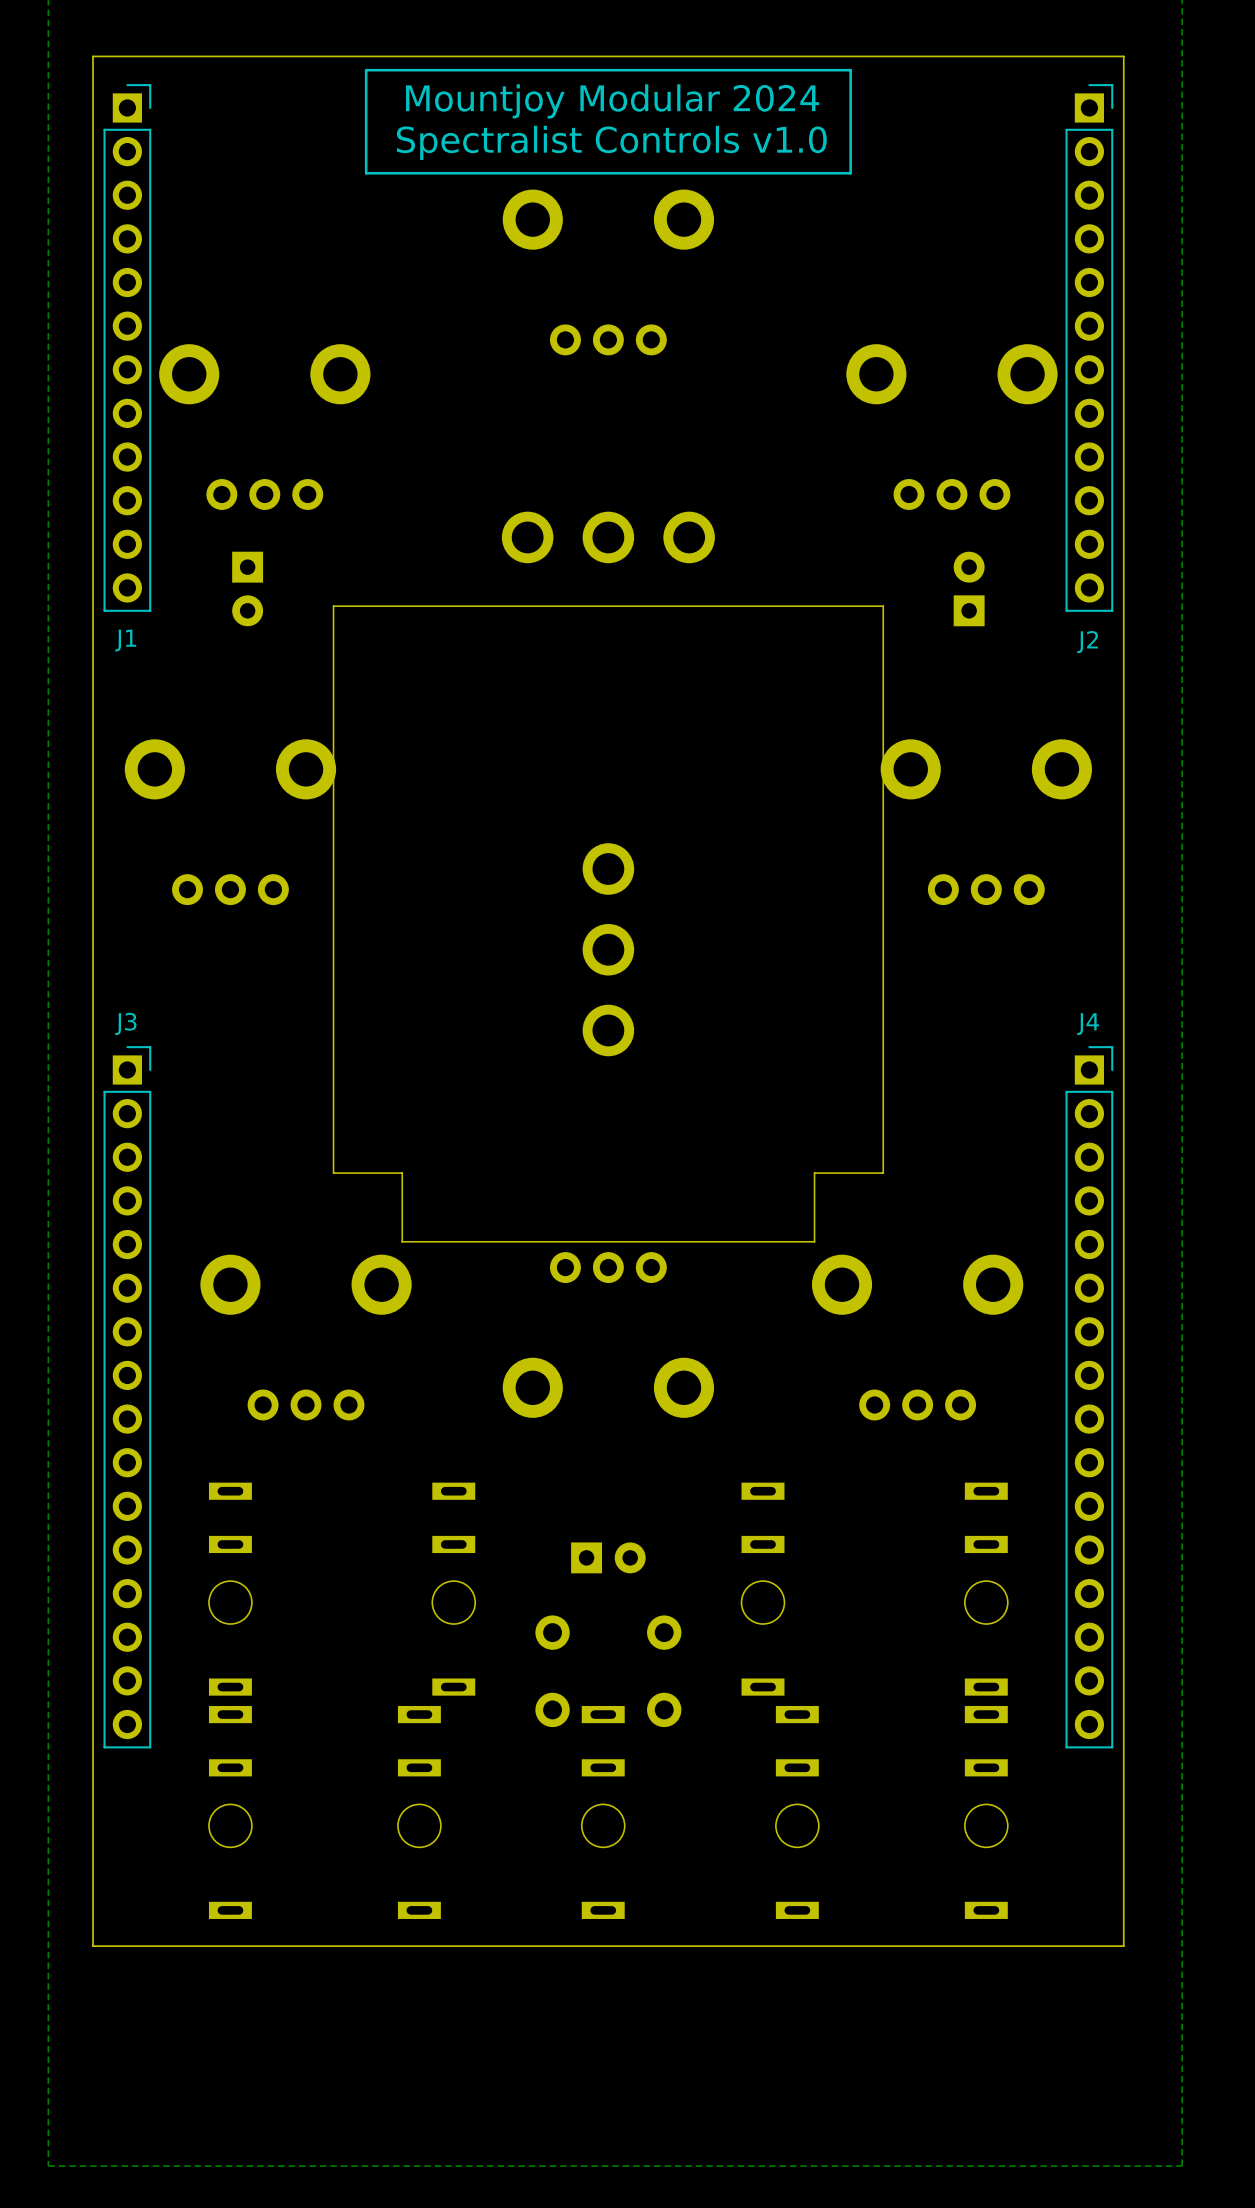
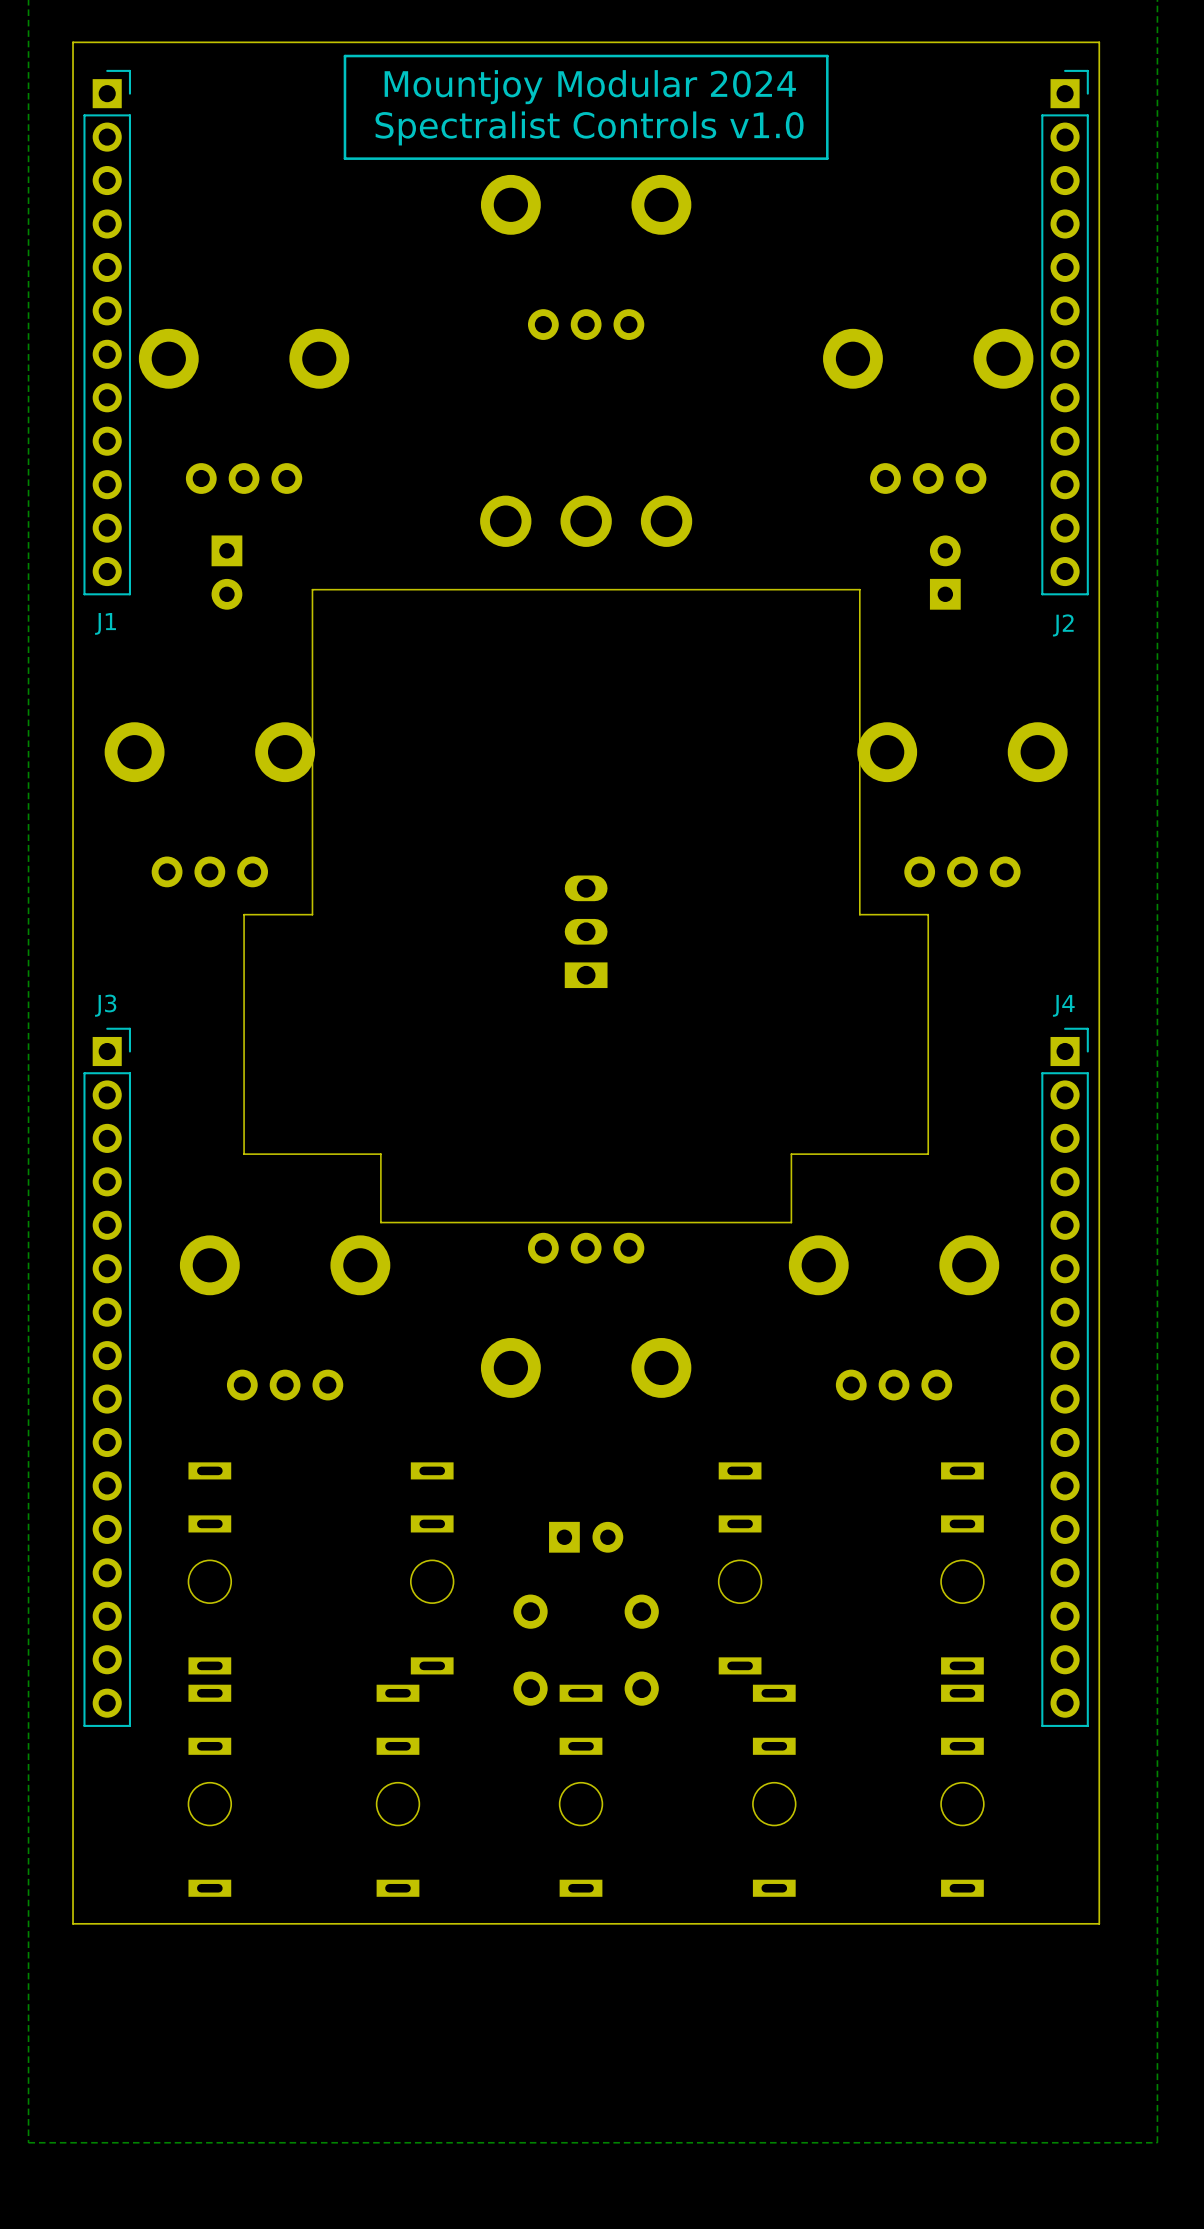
part footprint: [582, 843, 635, 1057] -> [564, 875, 608, 989]
board edge: (333, 932) (333, 1173) -> (312, 914) (244, 914) (244, 1154) (312, 1154)
board edge: (883, 932) (883, 1173) -> (859, 914) (928, 914) (928, 1154) (859, 1154)

